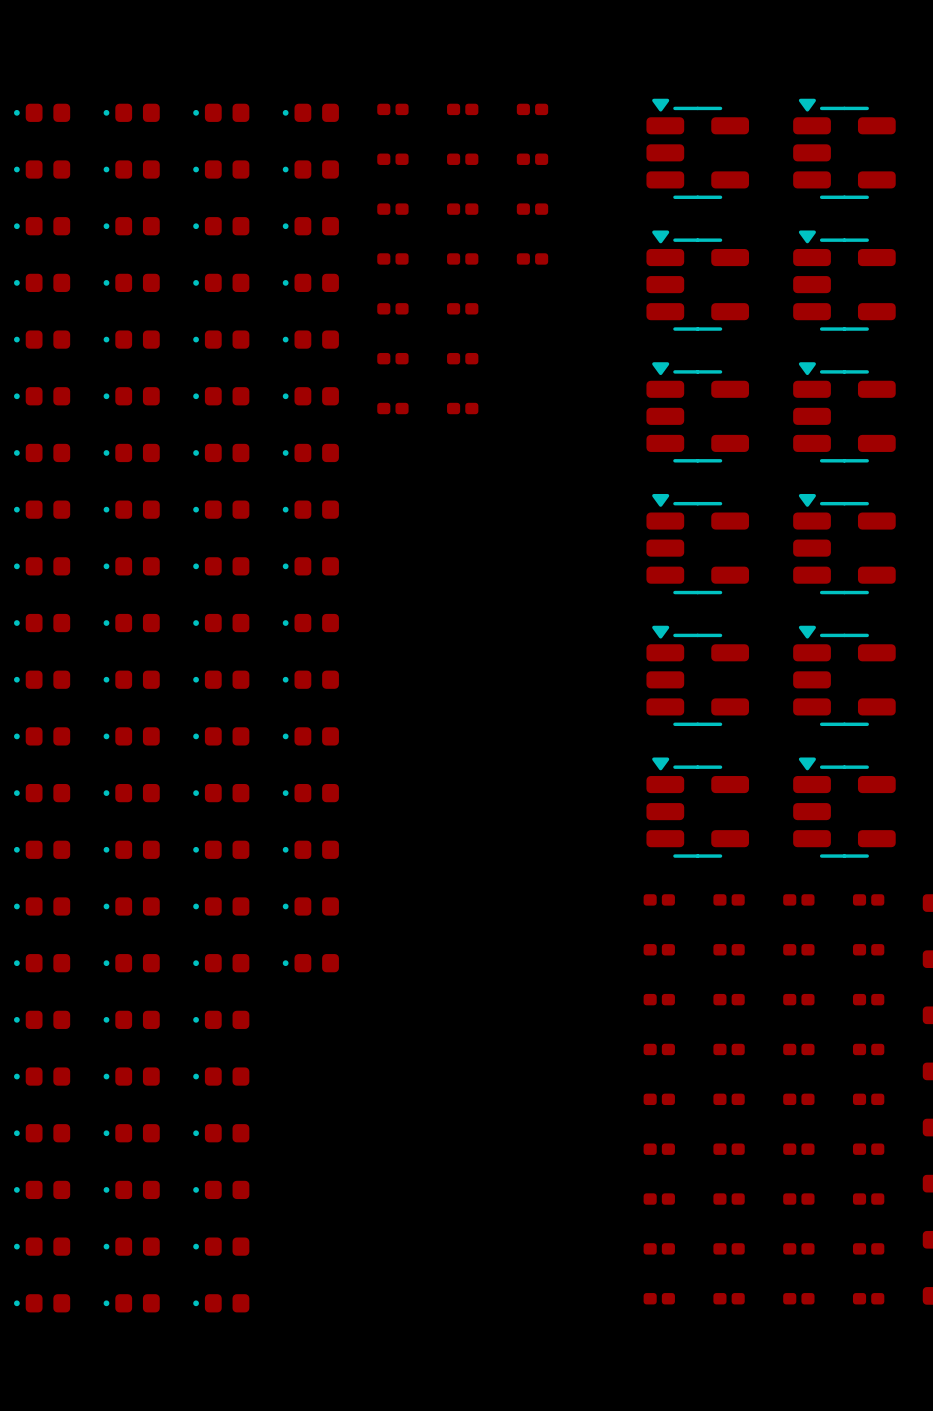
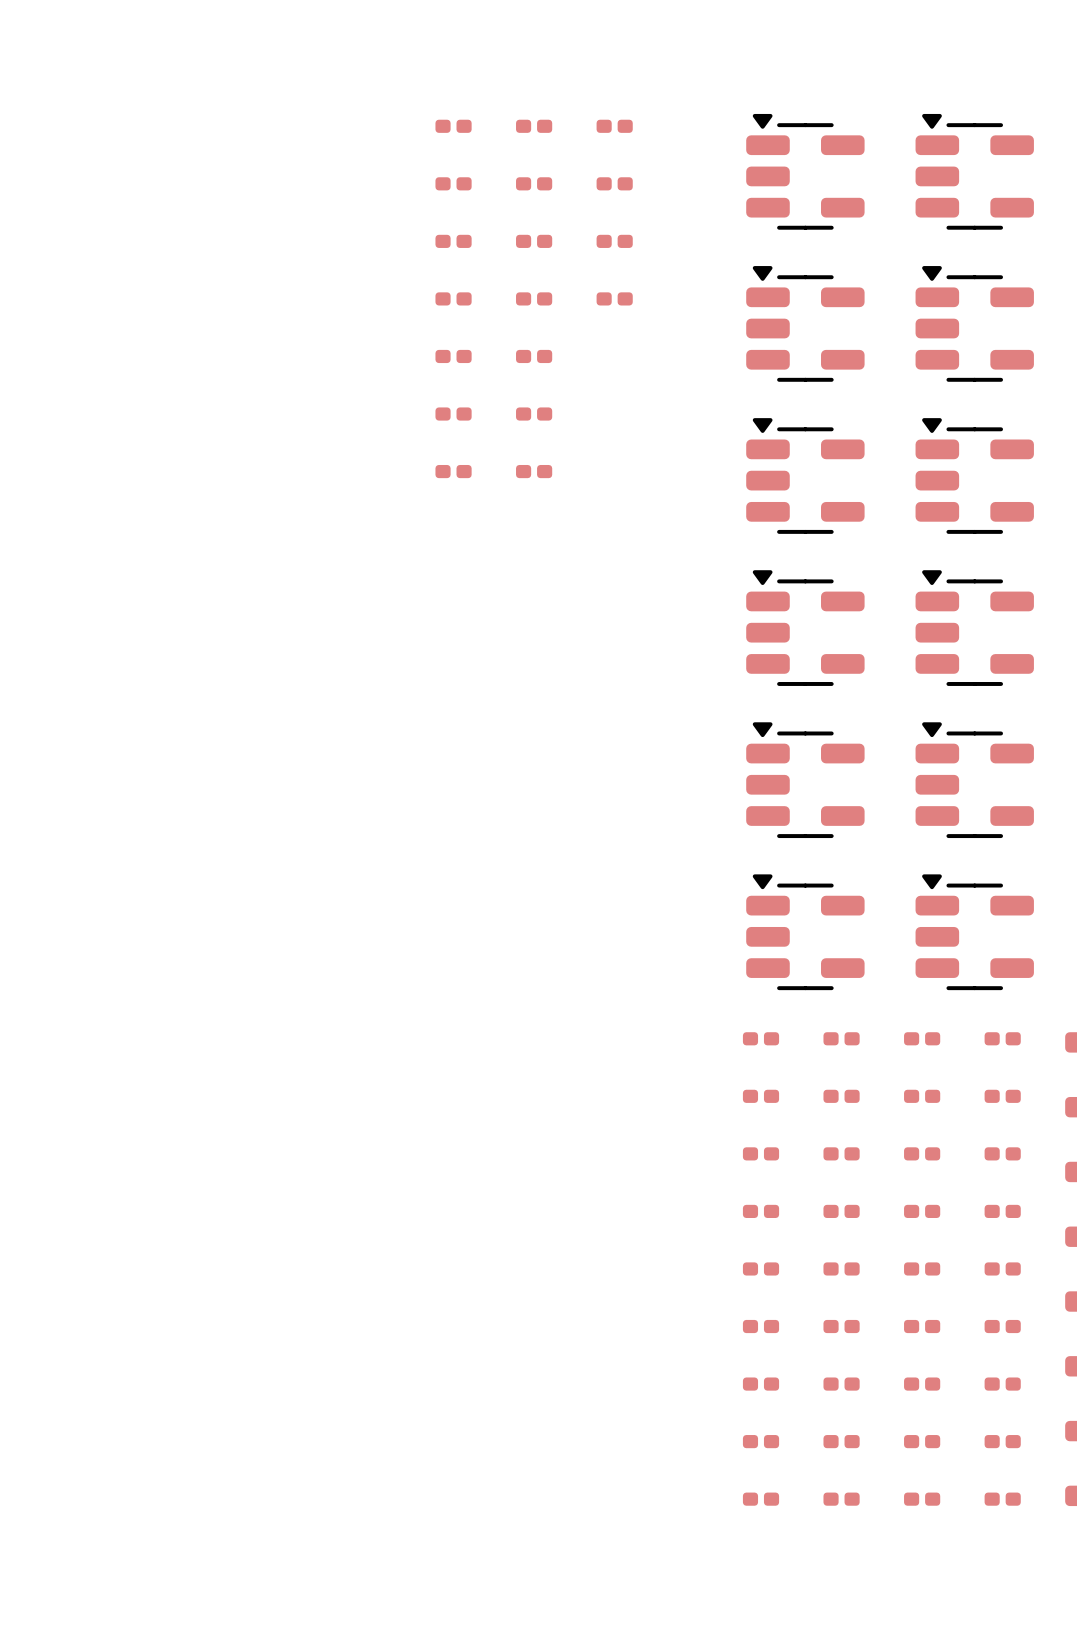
part: (42, 112) -> none
part: (131, 112) -> none
part: (221, 112) -> none
part: (310, 112) -> none
part: (42, 169) -> none
part: (131, 169) -> none
part: (221, 169) -> none
part: (310, 169) -> none
part: (42, 226) -> none
part: (131, 226) -> none
part: (221, 226) -> none
part: (310, 226) -> none
part: (42, 282) -> none
part: (131, 282) -> none
part: (221, 282) -> none
part: (310, 282) -> none
part: (42, 339) -> none
part: (131, 339) -> none
part: (221, 339) -> none
part: (310, 339) -> none
part: (42, 396) -> none
part: (131, 396) -> none
part: (221, 396) -> none
part: (310, 396) -> none
part: (42, 452) -> none
part: (131, 452) -> none
part: (221, 452) -> none
part: (310, 452) -> none
part: (42, 509) -> none
part: (131, 509) -> none
part: (221, 509) -> none
part: (310, 509) -> none
part: (42, 566) -> none
part: (131, 566) -> none
part: (221, 566) -> none
part: (310, 566) -> none
part: (42, 623) -> none
part: (131, 623) -> none
part: (221, 623) -> none
part: (310, 623) -> none
part: (42, 679) -> none
part: (131, 679) -> none
part: (221, 679) -> none
part: (310, 679) -> none
part: (42, 736) -> none
part: (131, 736) -> none
part: (221, 736) -> none
part: (310, 736) -> none
part: (42, 793) -> none
part: (131, 793) -> none
part: (221, 793) -> none
part: (310, 793) -> none
part: (42, 849) -> none
part: (131, 849) -> none
part: (221, 849) -> none
part: (310, 849) -> none
part: (42, 906) -> none
part: (131, 906) -> none
part: (221, 906) -> none
part: (310, 906) -> none
part: (42, 963) -> none
part: (131, 963) -> none
part: (221, 963) -> none
part: (310, 963) -> none
part: (42, 1019) -> none
part: (131, 1019) -> none
part: (221, 1019) -> none
part: (42, 1076) -> none
part: (131, 1076) -> none
part: (221, 1076) -> none
part: (42, 1133) -> none
part: (131, 1133) -> none
part: (221, 1133) -> none
part: (42, 1189) -> none
part: (131, 1189) -> none
part: (221, 1189) -> none
part: (42, 1246) -> none
part: (131, 1246) -> none
part: (221, 1246) -> none
part: (42, 1303) -> none
part: (131, 1303) -> none
part: (221, 1303) -> none

